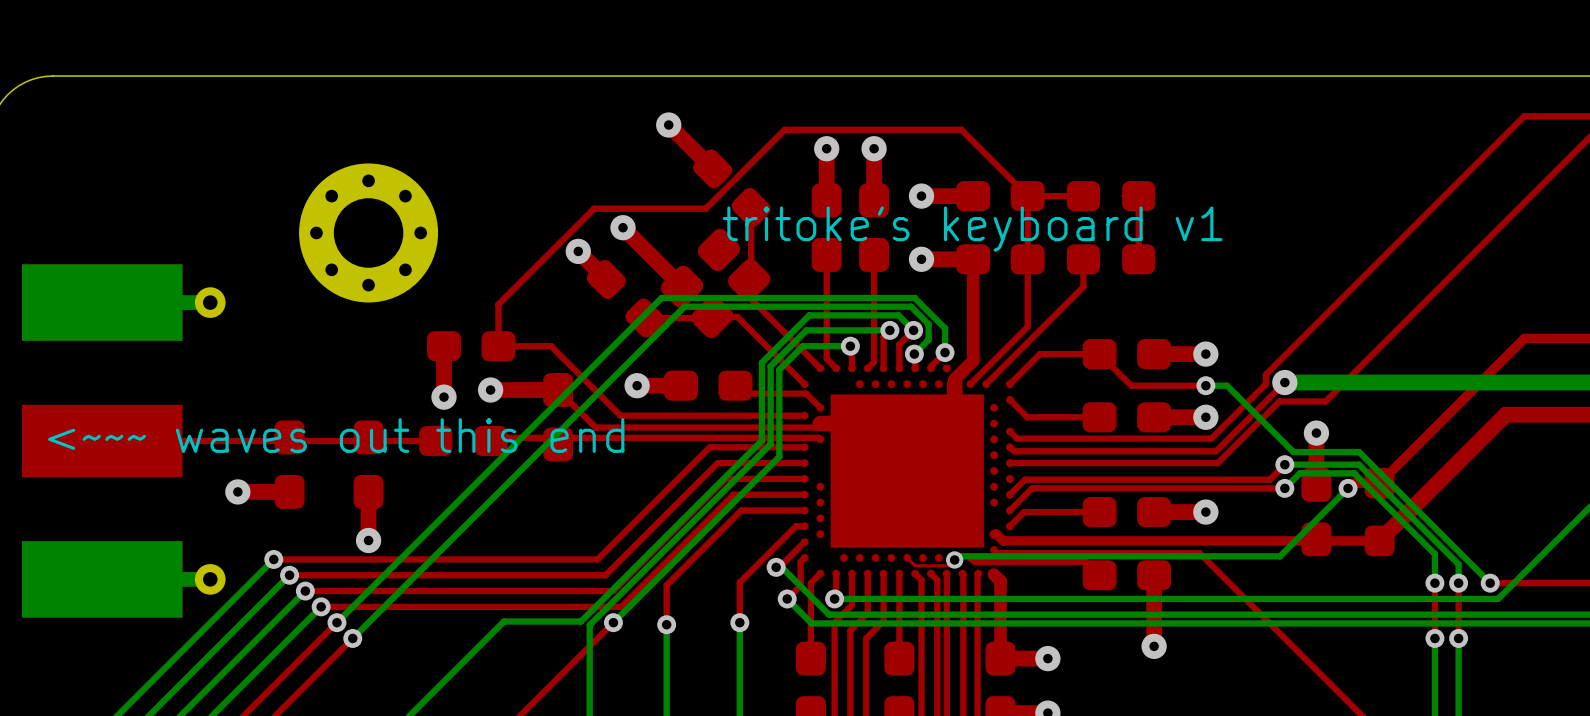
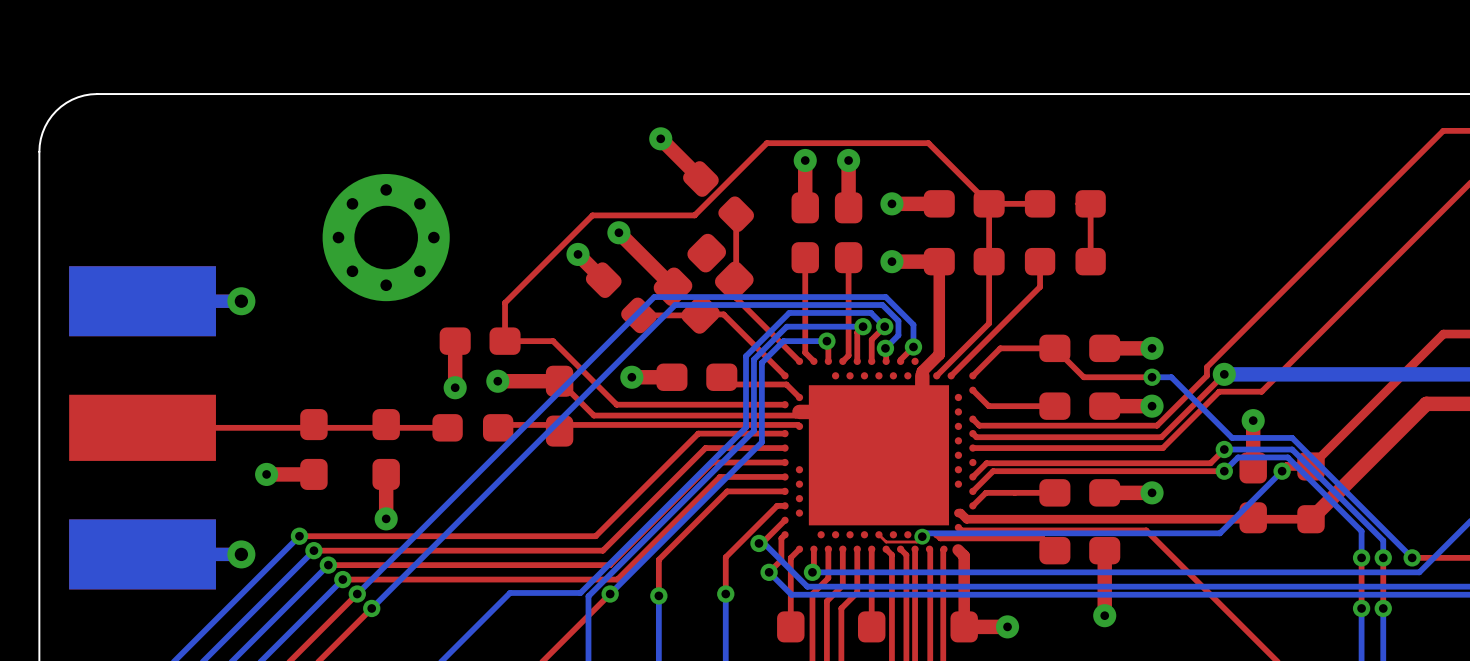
text: tritoke's keyboard v1 (972, 229) -> none
text: <~~~ waves out this end (336, 435) -> none

